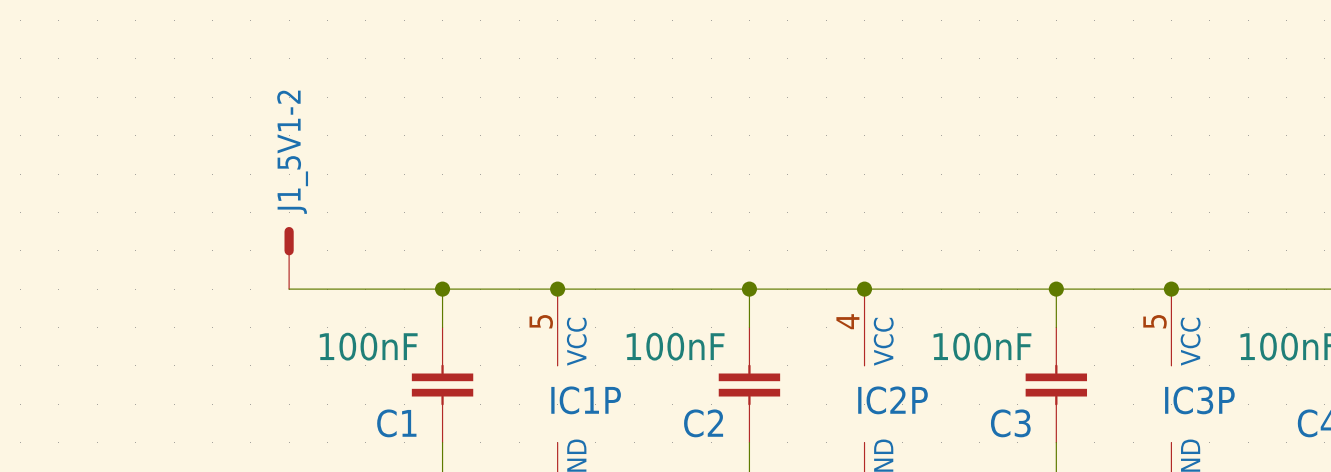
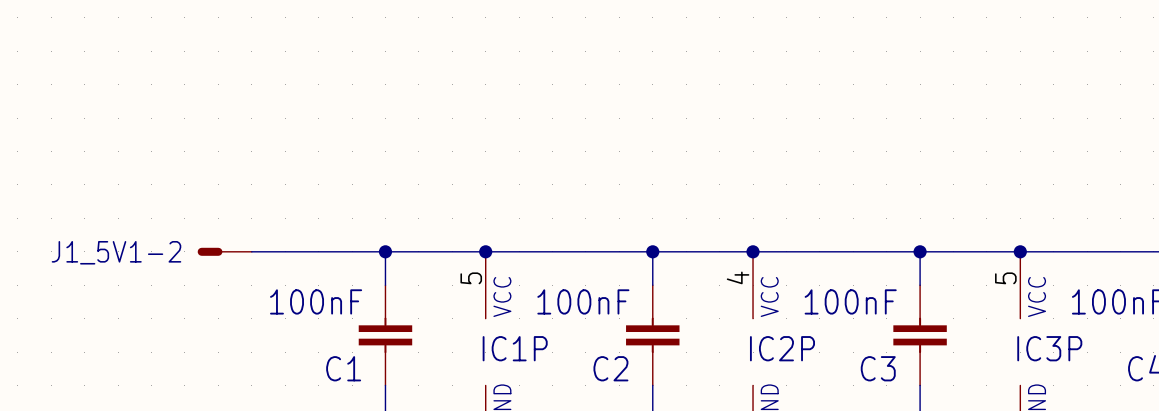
J1_5V1-2 rotation: 0° (289, 241) -> 90° counterclockwise (210, 251)
J1_5V1-2 position: (289, 258) -> (224, 251)

